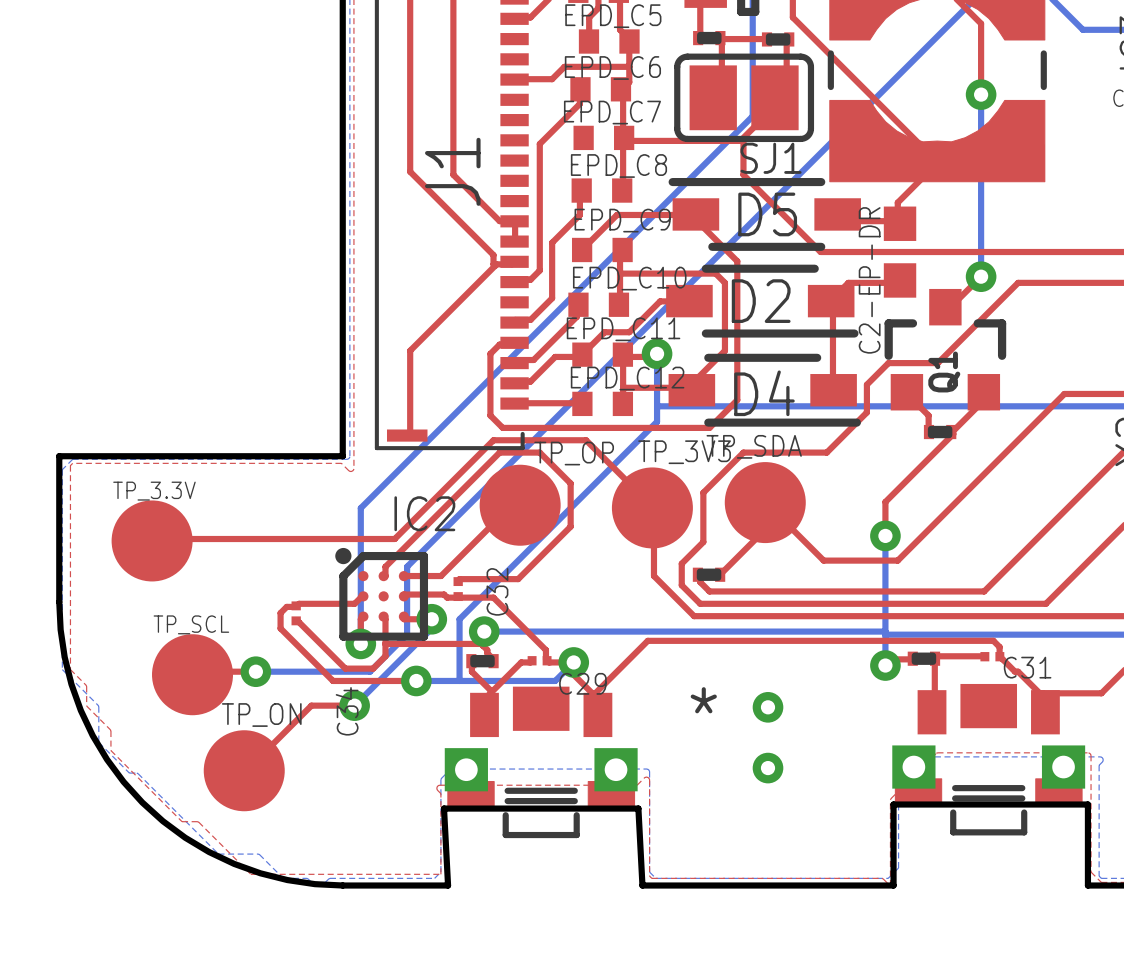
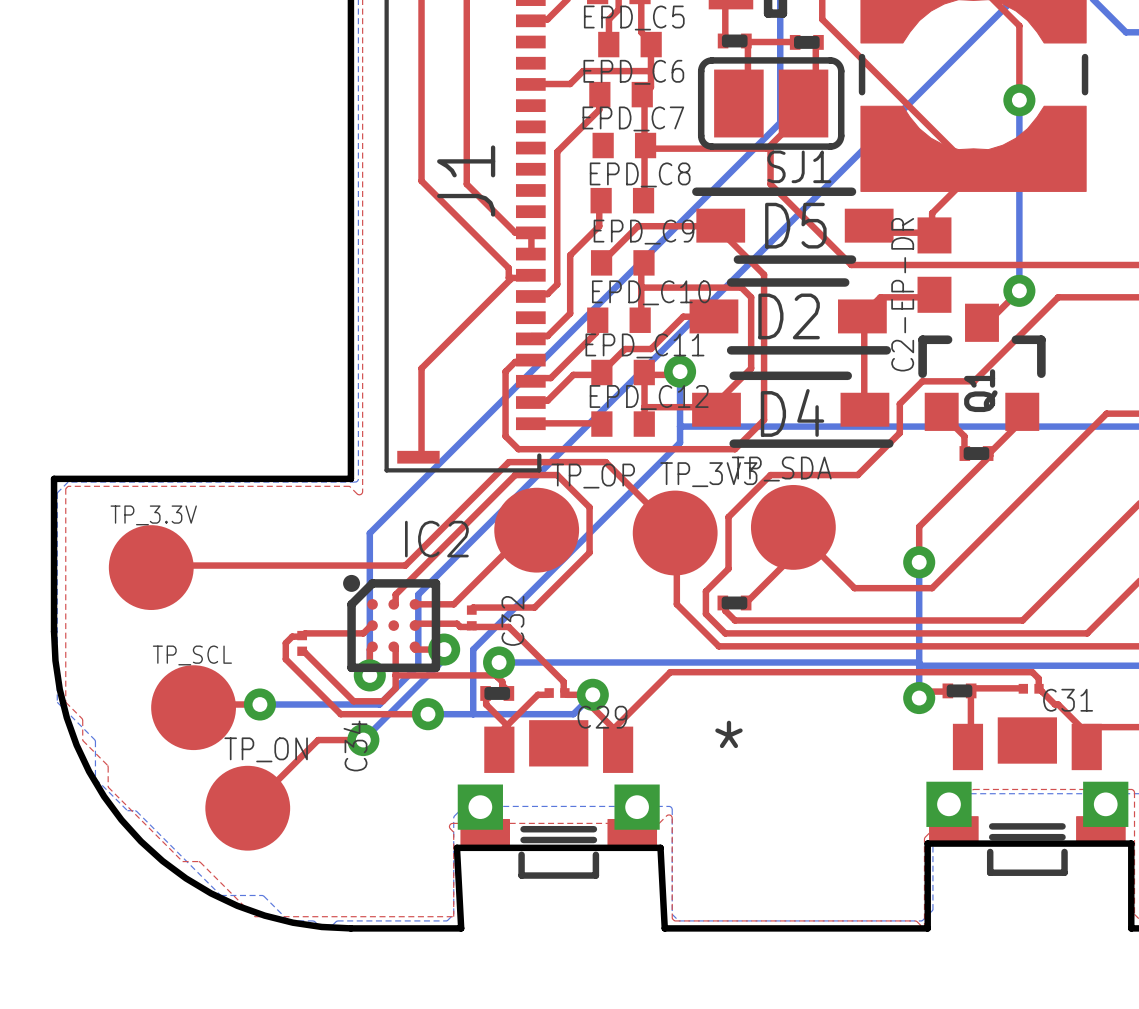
via: (768, 707) -> none
via: (768, 768) -> none

